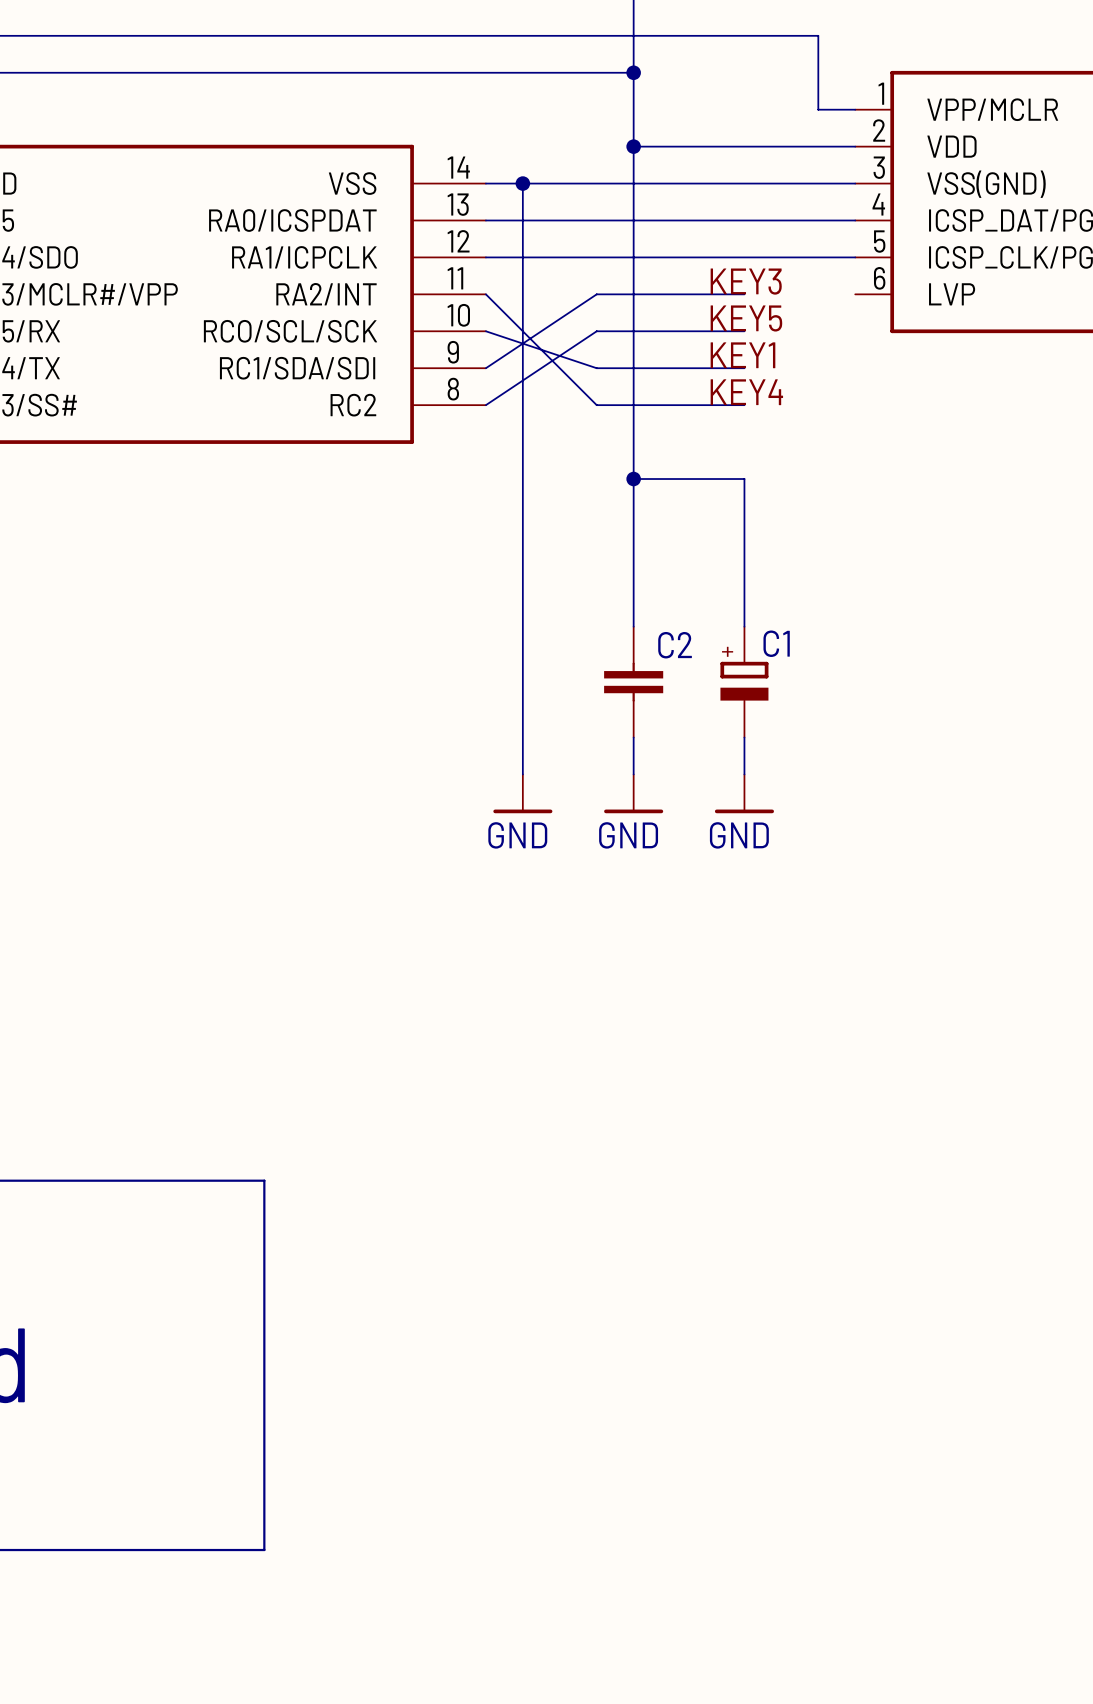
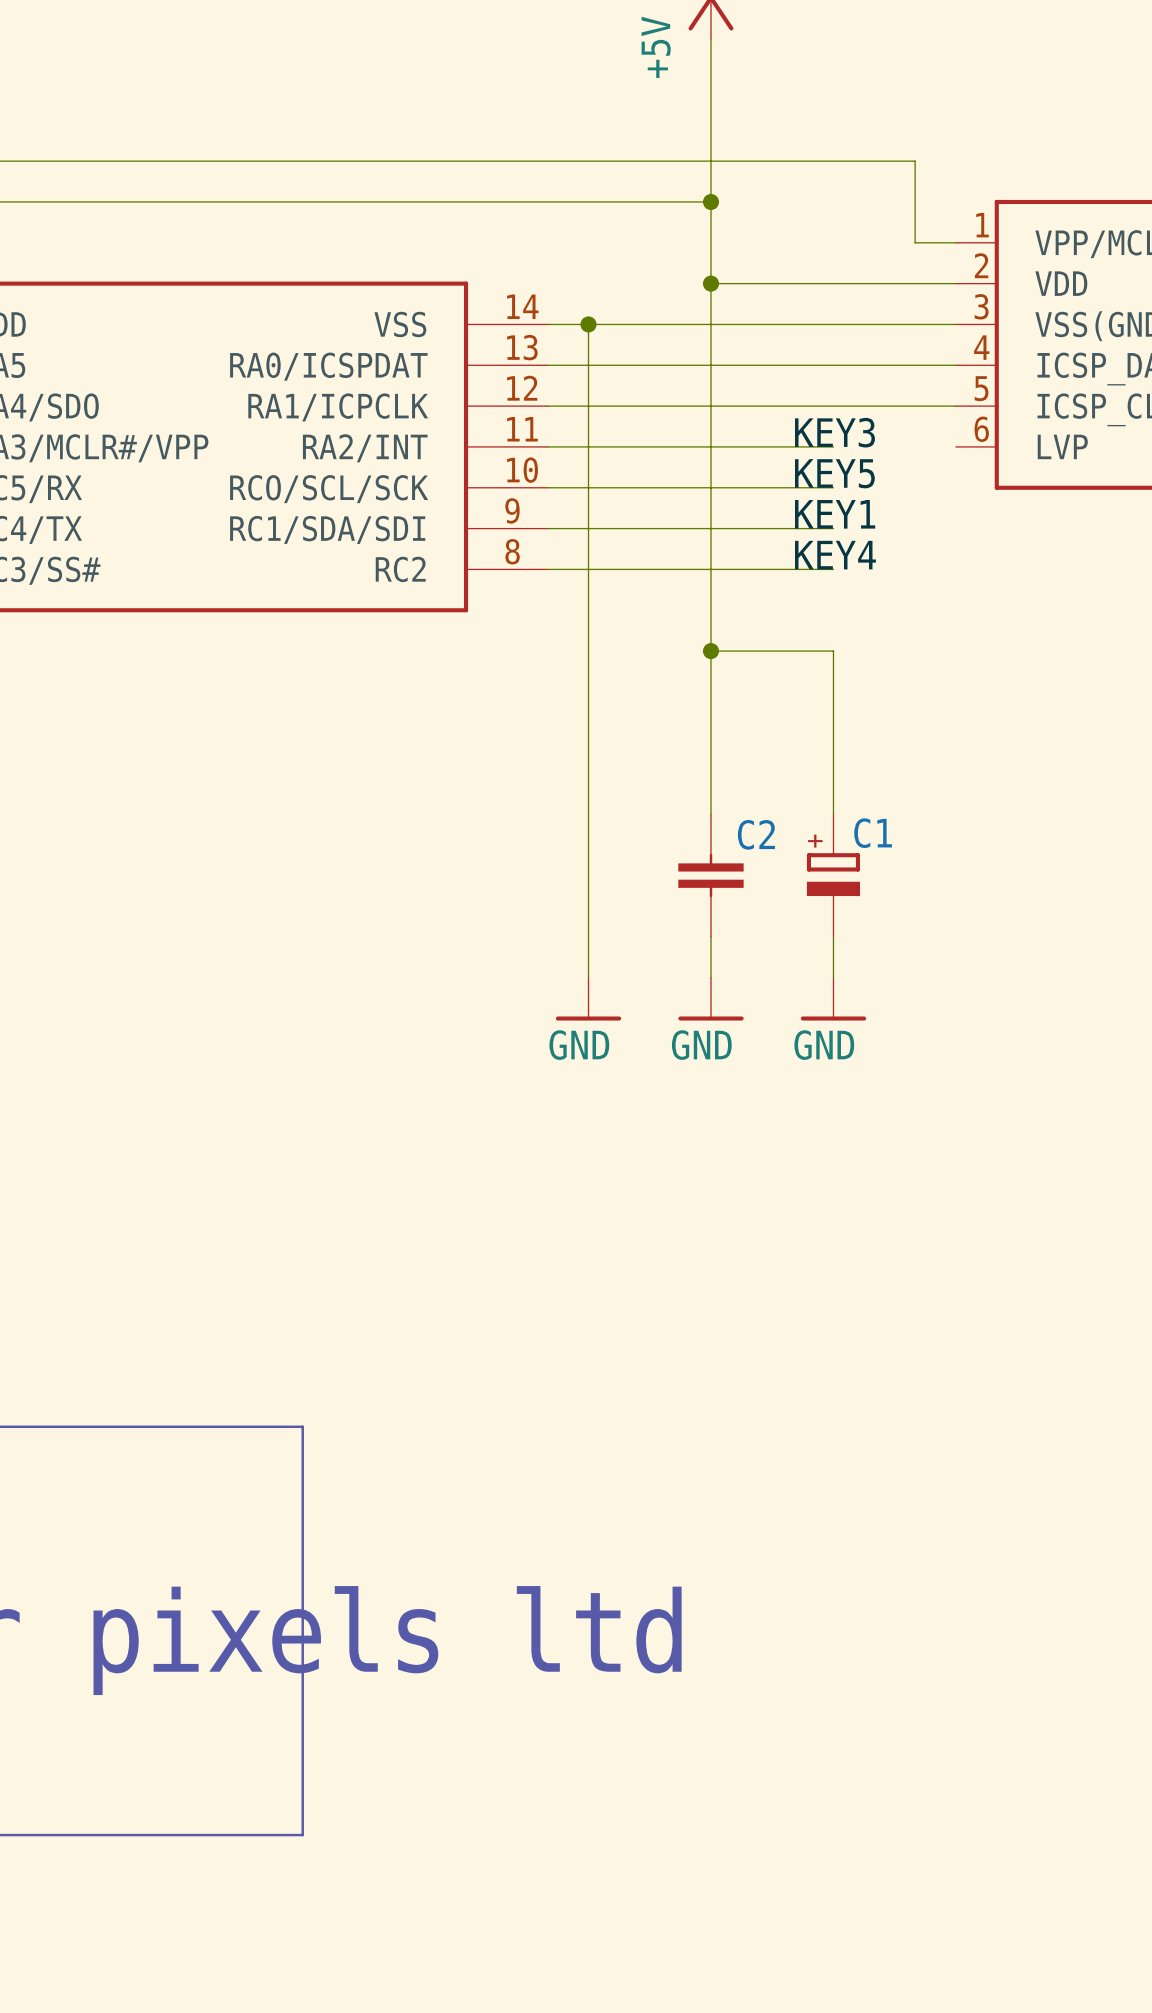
wire: (485, 294) (596, 405) -> none
wire: (596, 294) (485, 368) -> (670, 446) (547, 446)
wire: (485, 331) (596, 368) -> (547, 487) (670, 487)
wire: (596, 331) (485, 405) -> (670, 569) (547, 569)
wire: none -> (547, 528) (670, 528)

